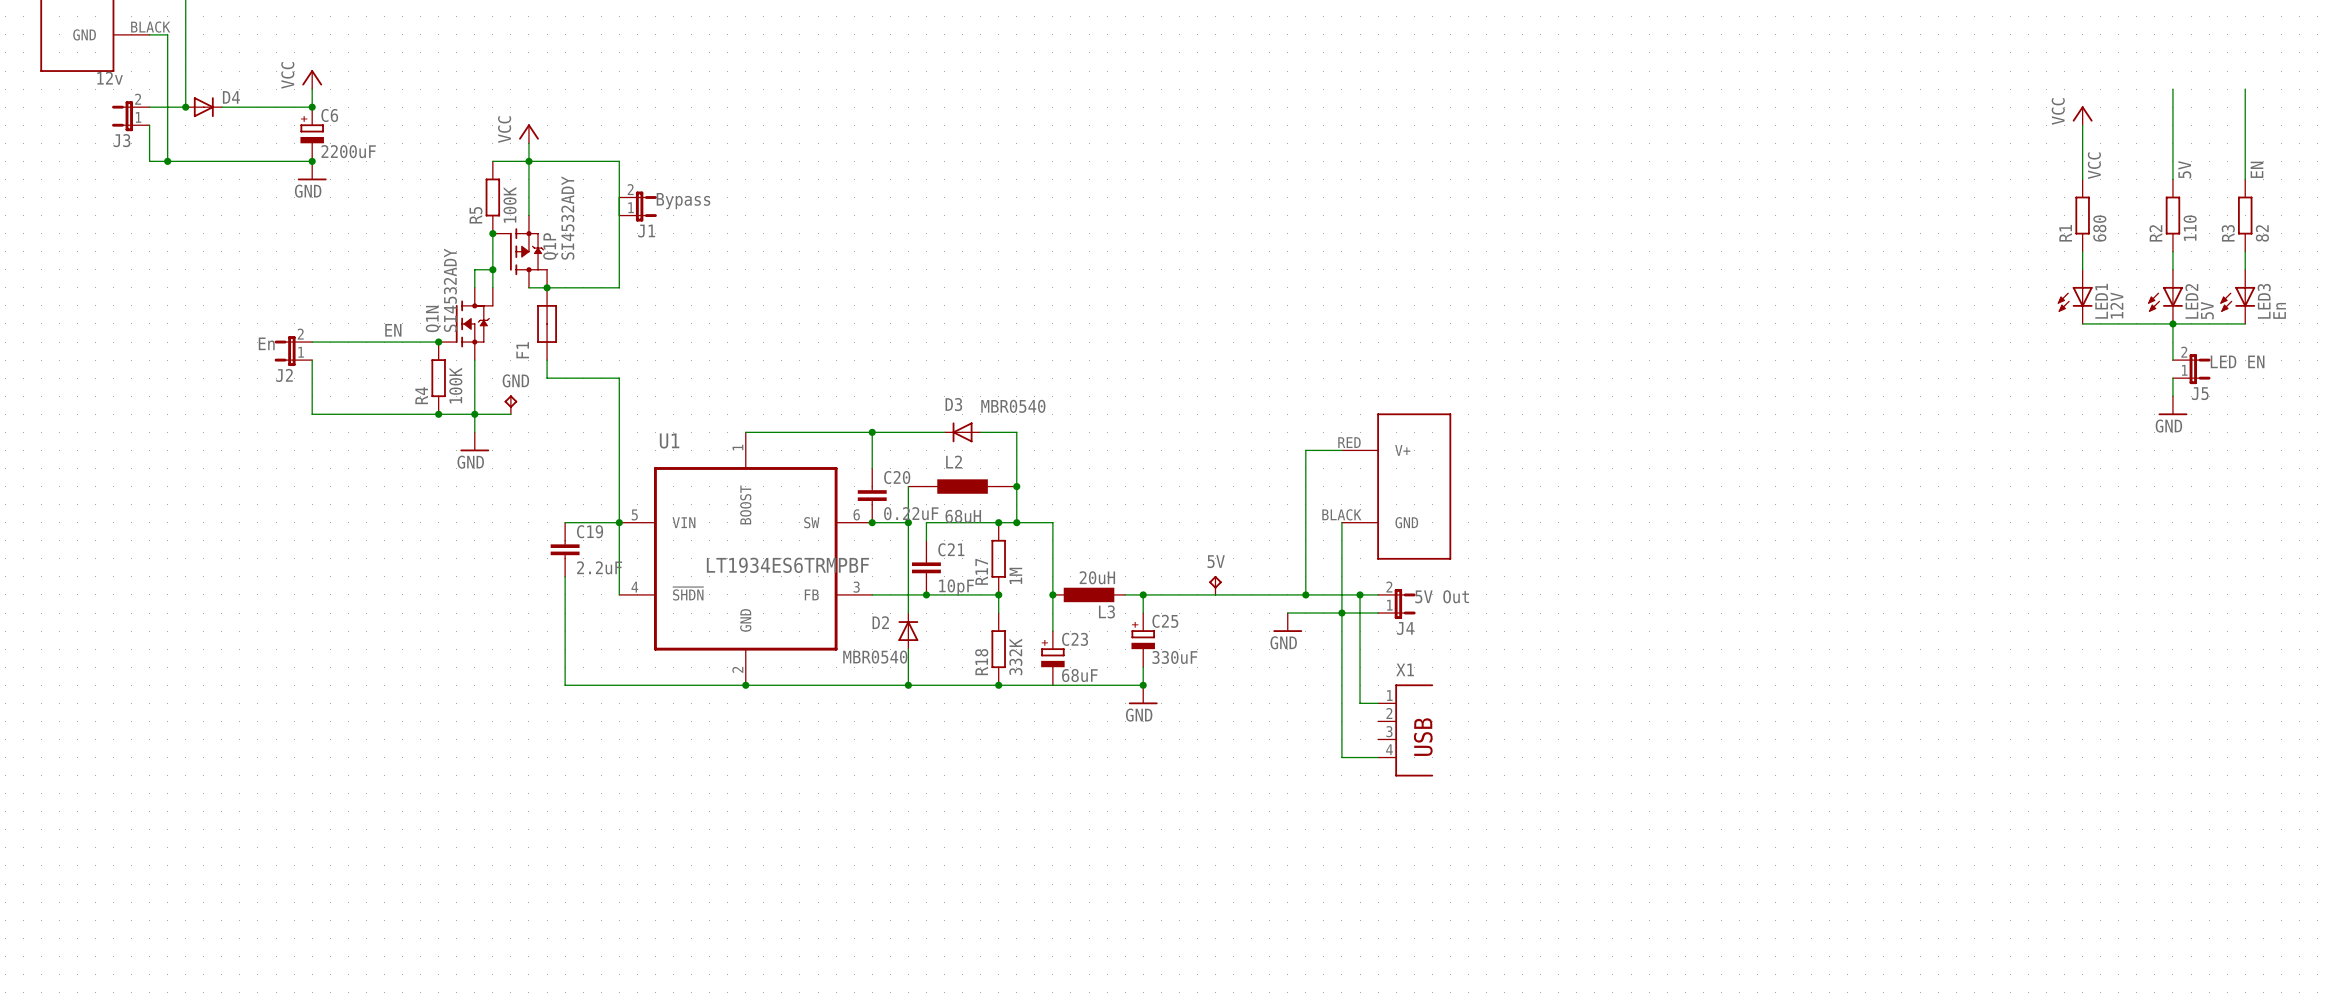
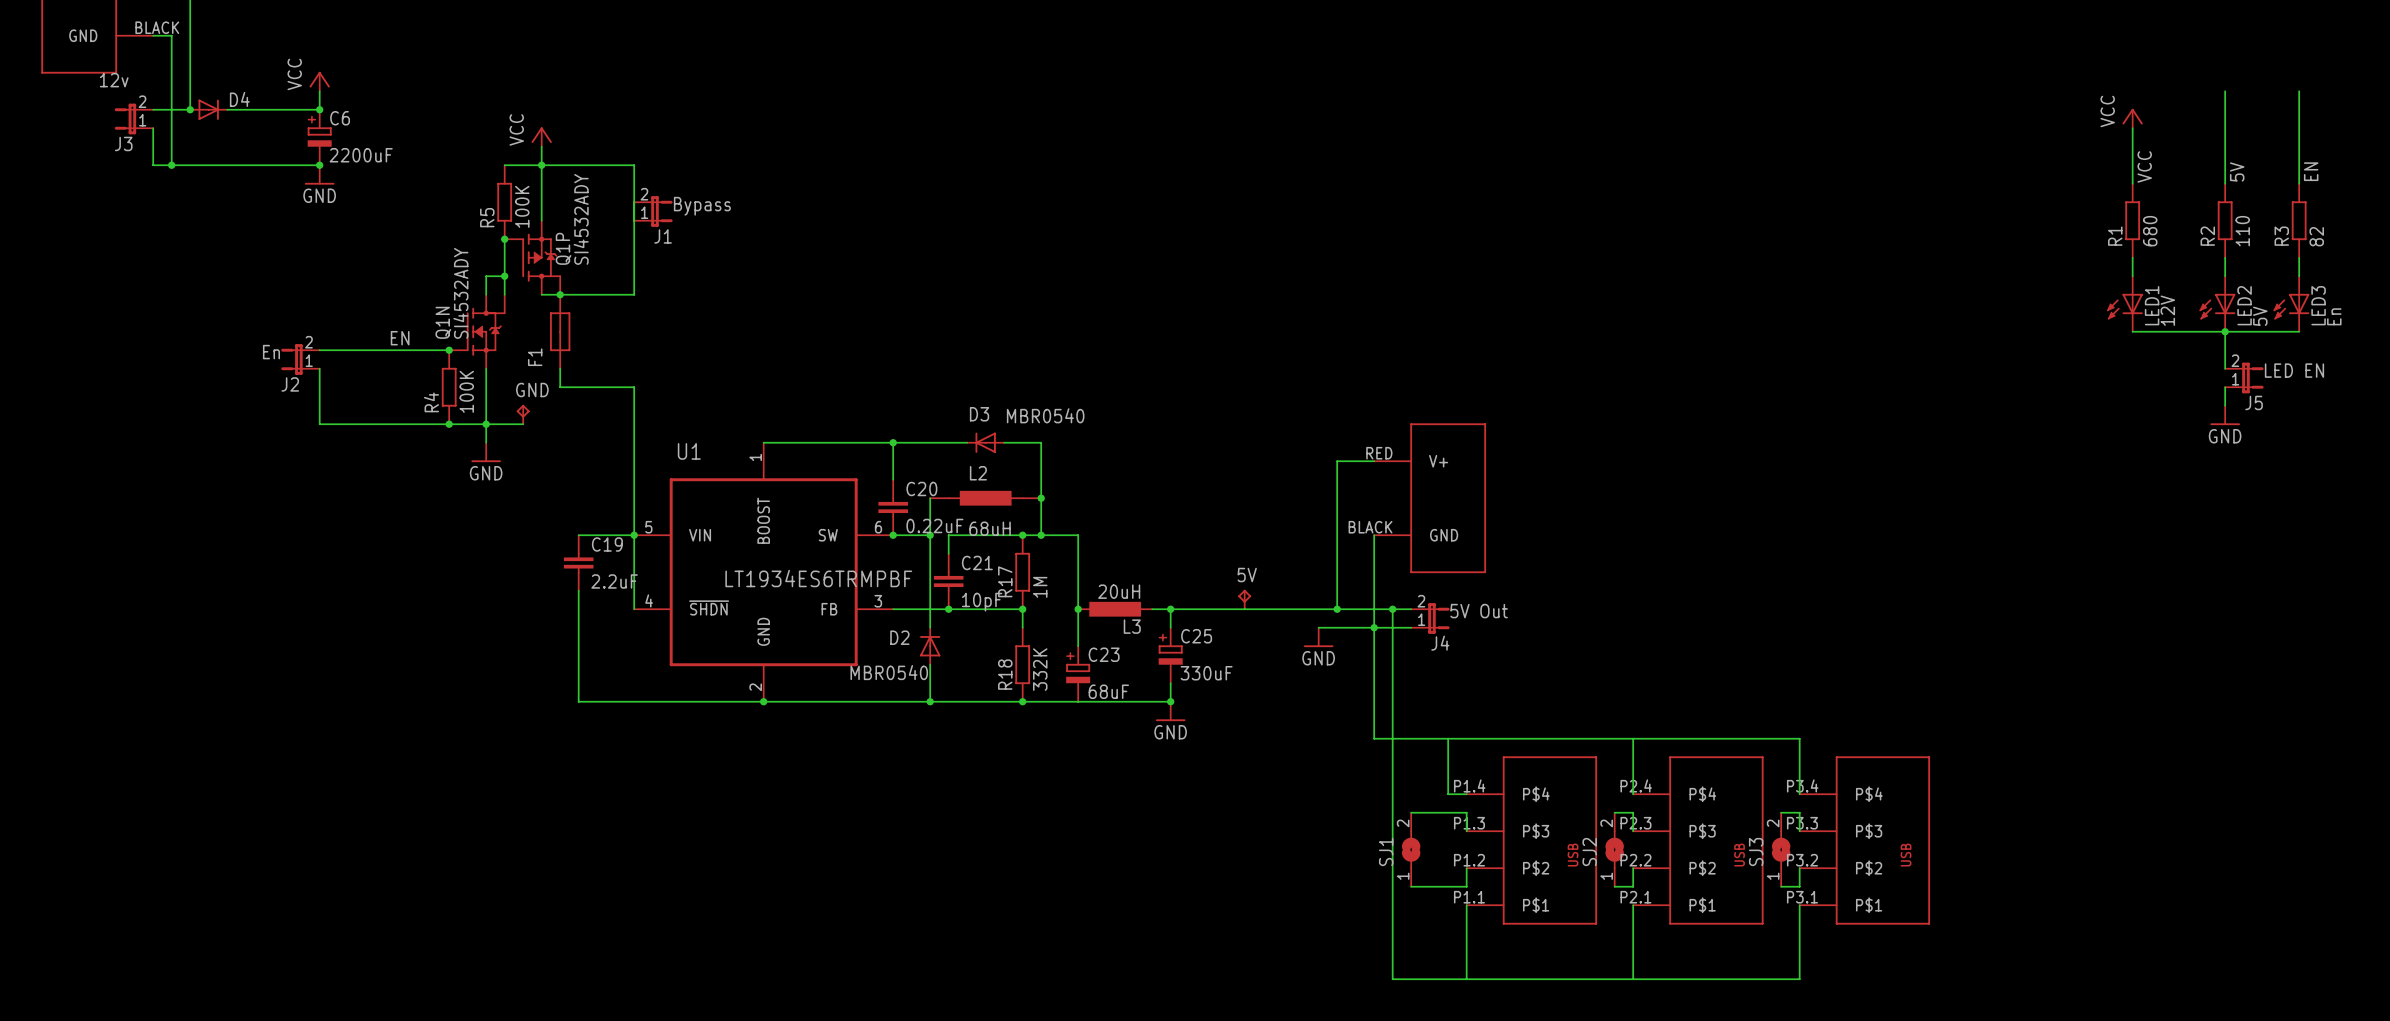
wire: (1360, 703) (1378, 703) -> (1392, 720) (1392, 979) (1799, 979) (1799, 905)
wire: (1341, 721) (1341, 757) (1378, 757) -> (1374, 738) (1799, 738) (1799, 794)
wire: none -> (1448, 738) (1448, 794) (1466, 794)
wire: none -> (1633, 738) (1633, 794)
X1: (1405, 730) -> none
wire: none -> (1411, 812) (1466, 812) (1466, 831)
wire: none -> (1614, 812) (1633, 812) (1633, 831)
wire: none -> (1781, 812) (1799, 812) (1799, 831)
part: none -> (1531, 840)
part: none -> (1698, 840)
part: none -> (1864, 840)
SJ1: none -> (1411, 849)
SJ2: none -> (1614, 849)
SJ3: none -> (1781, 849)
wire: none -> (1466, 868) (1466, 886) (1411, 886)
wire: none -> (1633, 868) (1633, 886) (1614, 886)
wire: none -> (1799, 868) (1799, 886) (1781, 886)
wire: none -> (1466, 905) (1466, 979)
wire: none -> (1633, 905) (1633, 979)

